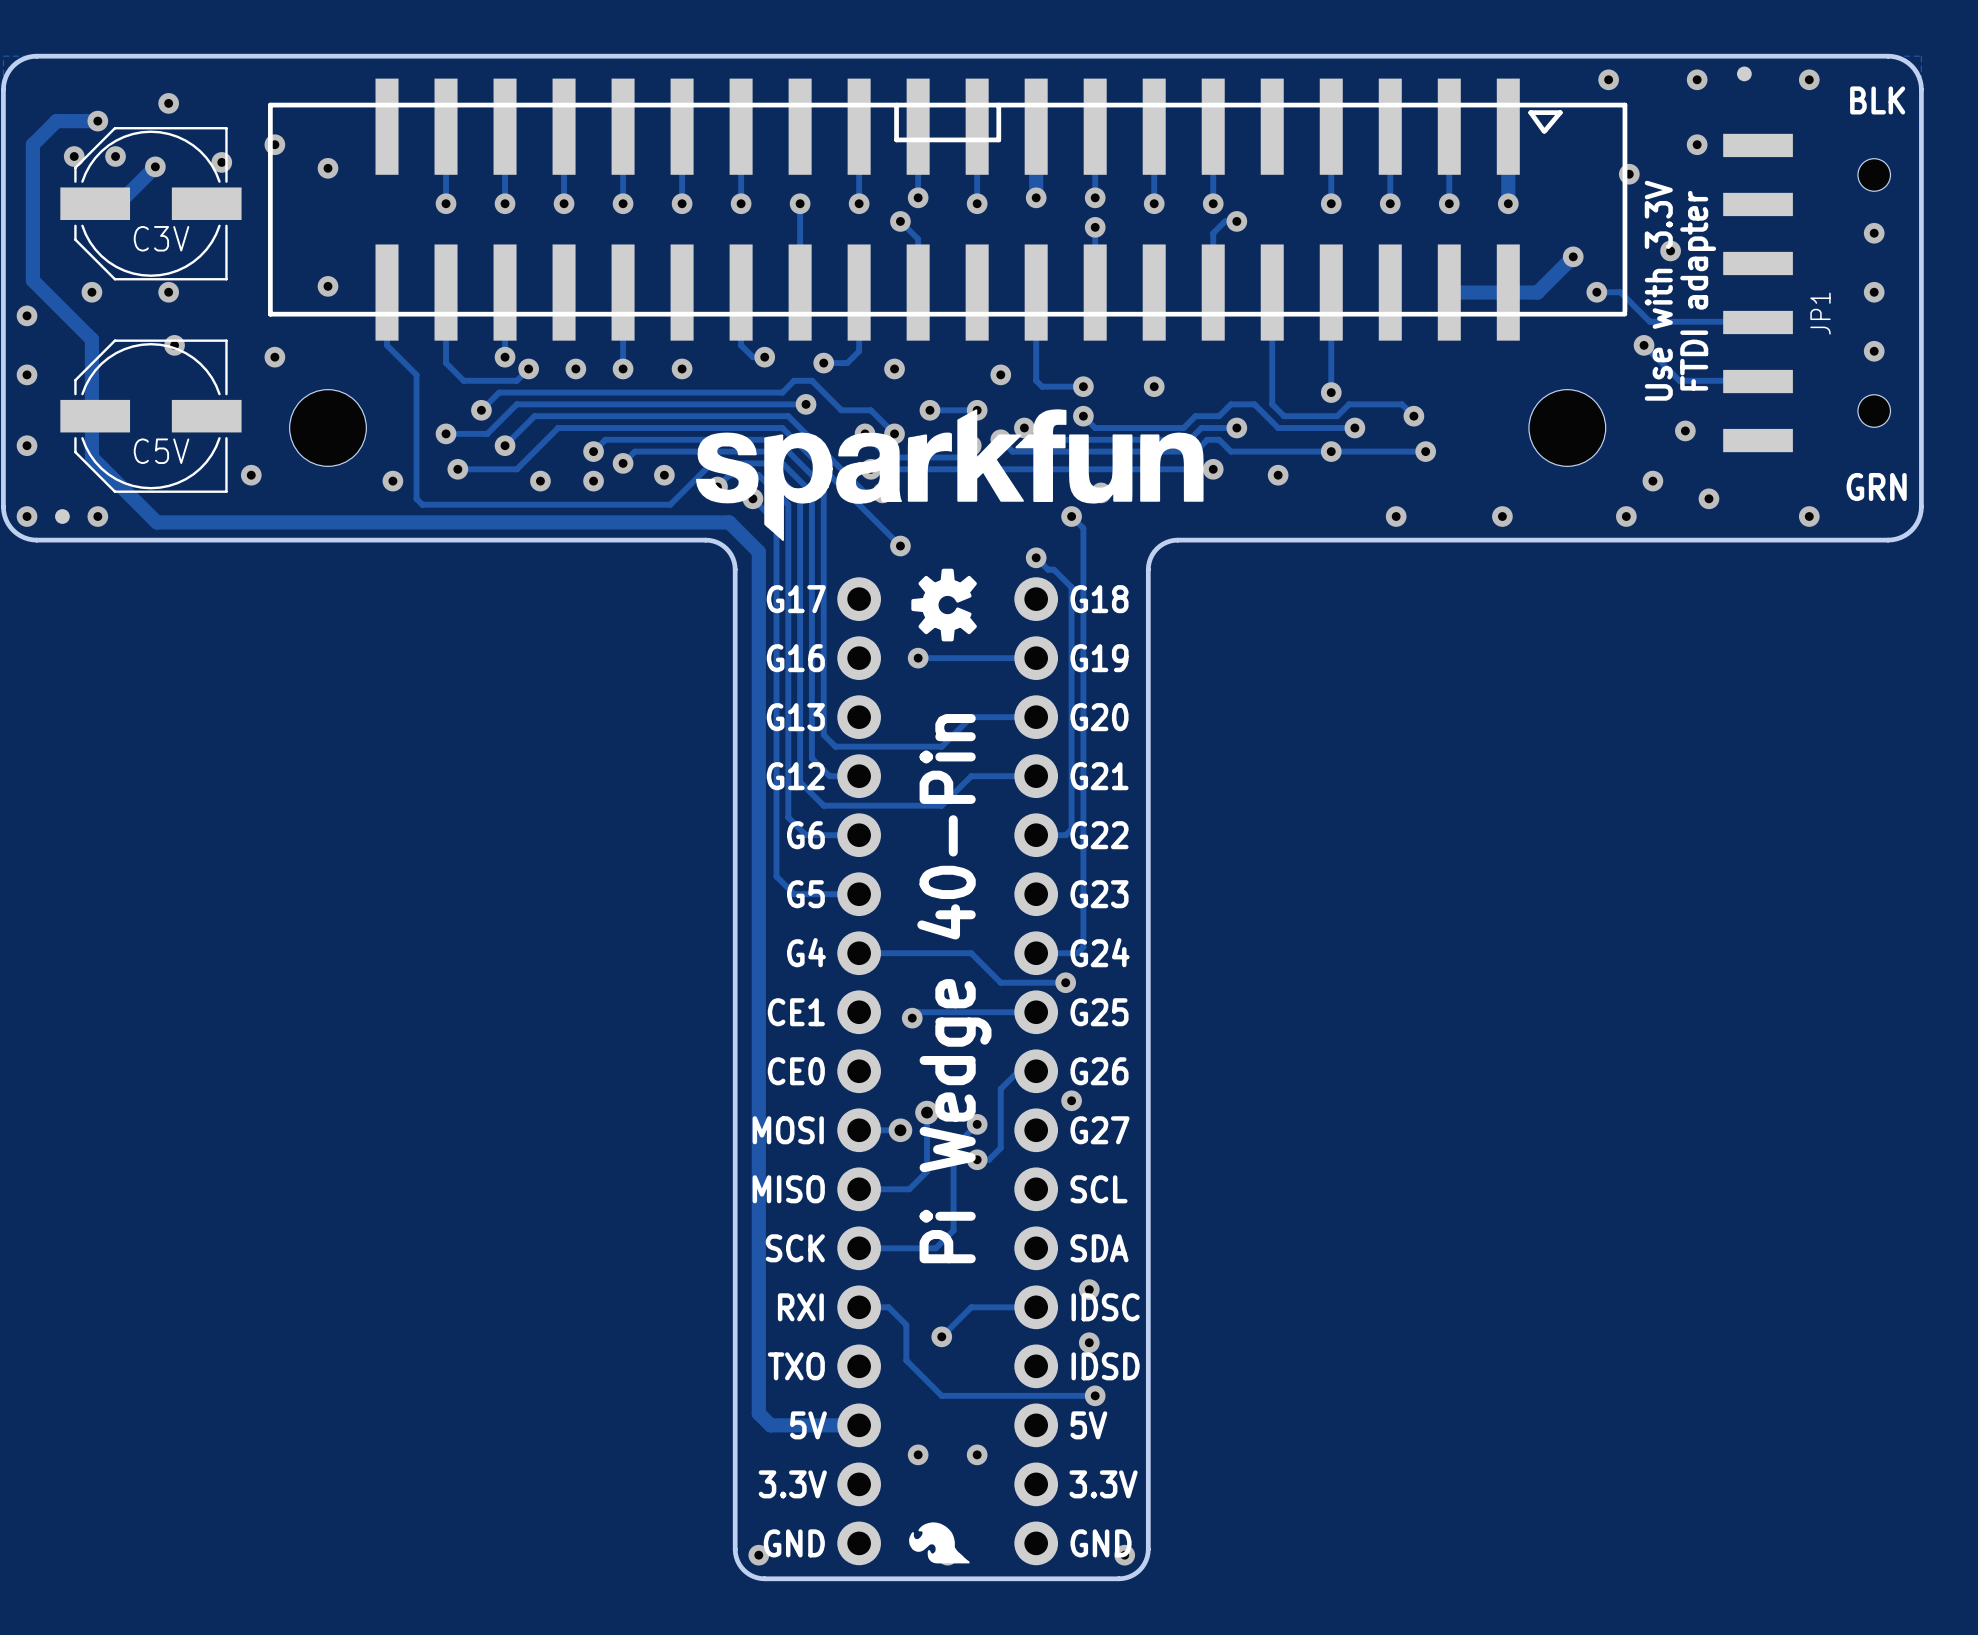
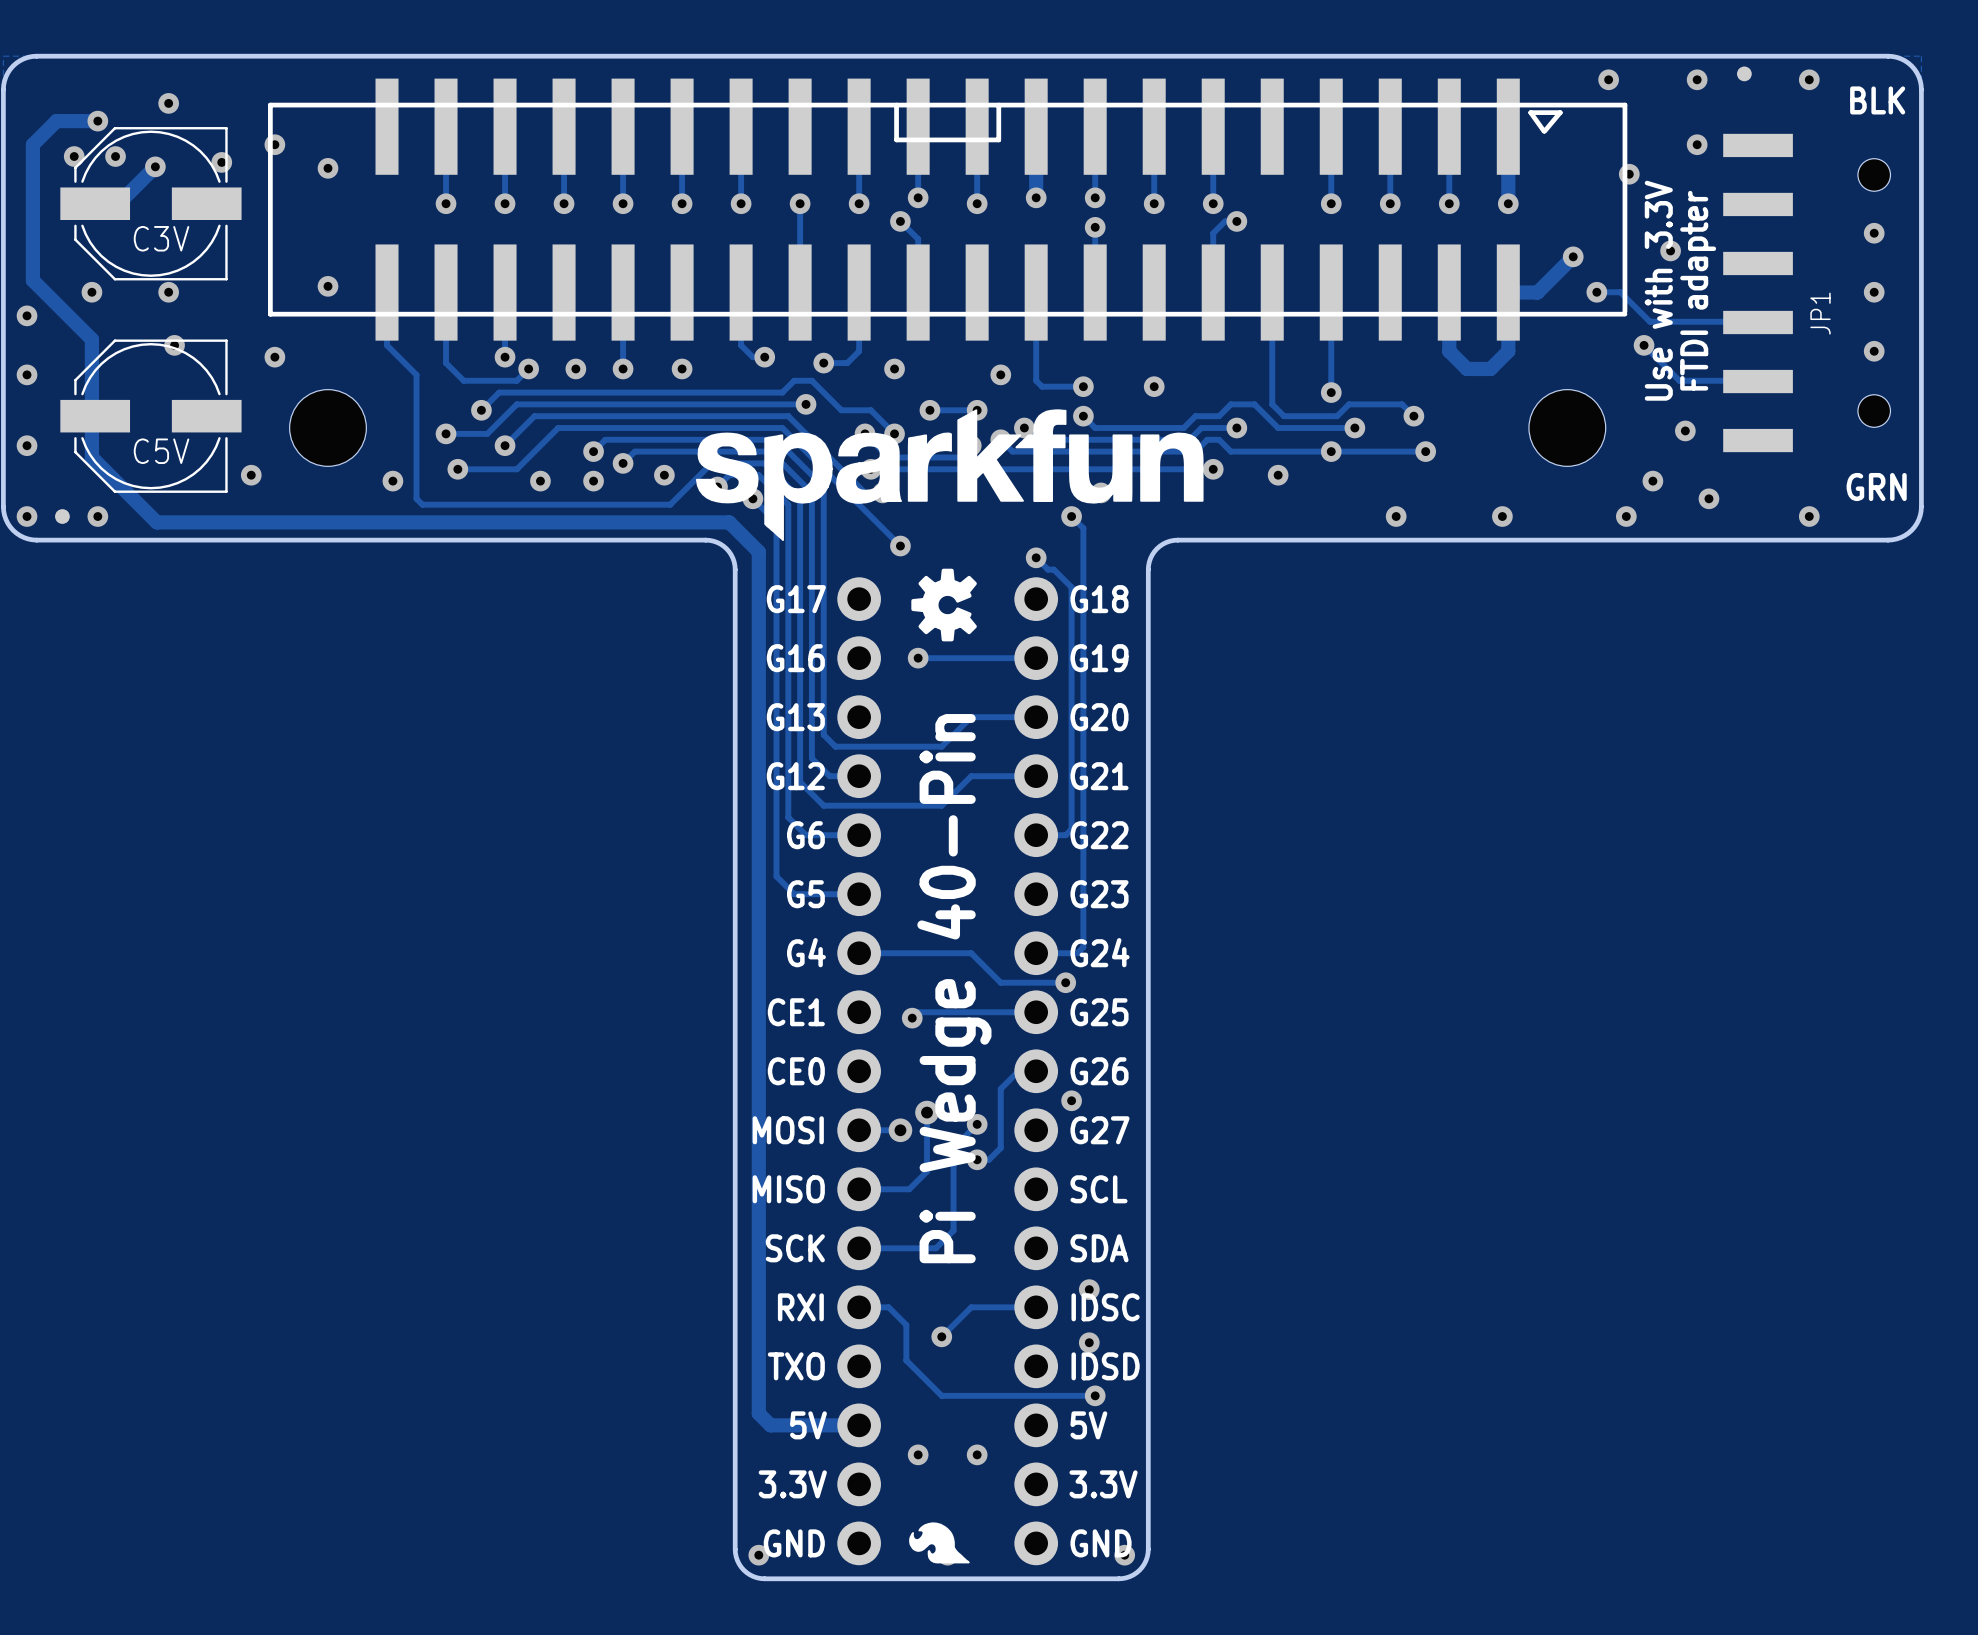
track: (1449, 292) (1508, 292) -> (1449, 292) (1449, 351) (1467, 368) (1490, 368) (1508, 351) (1508, 292)

